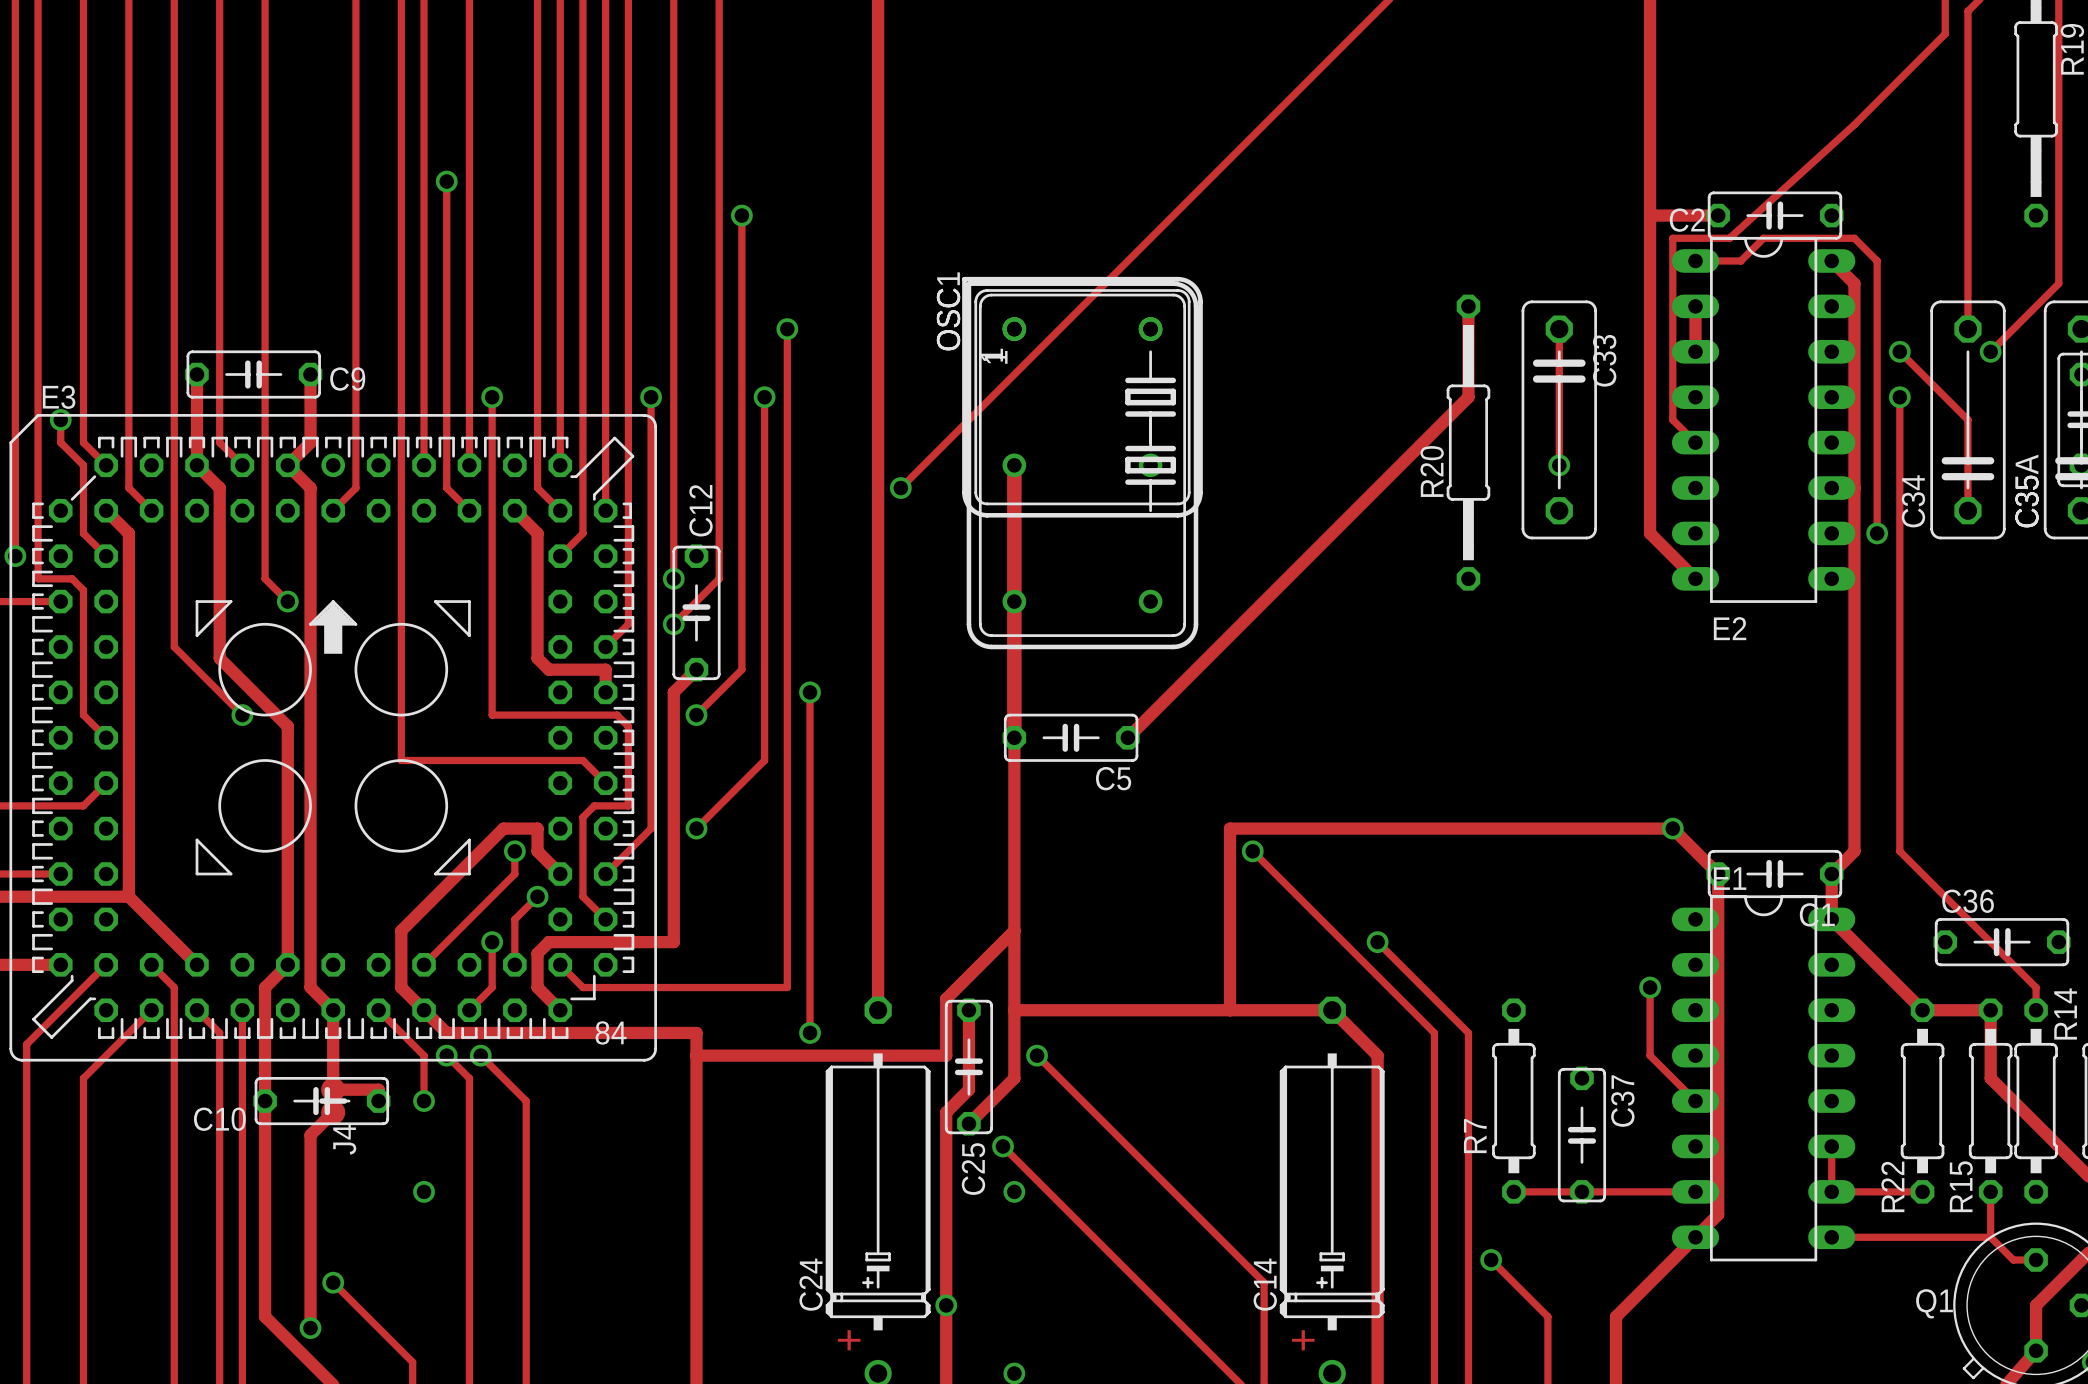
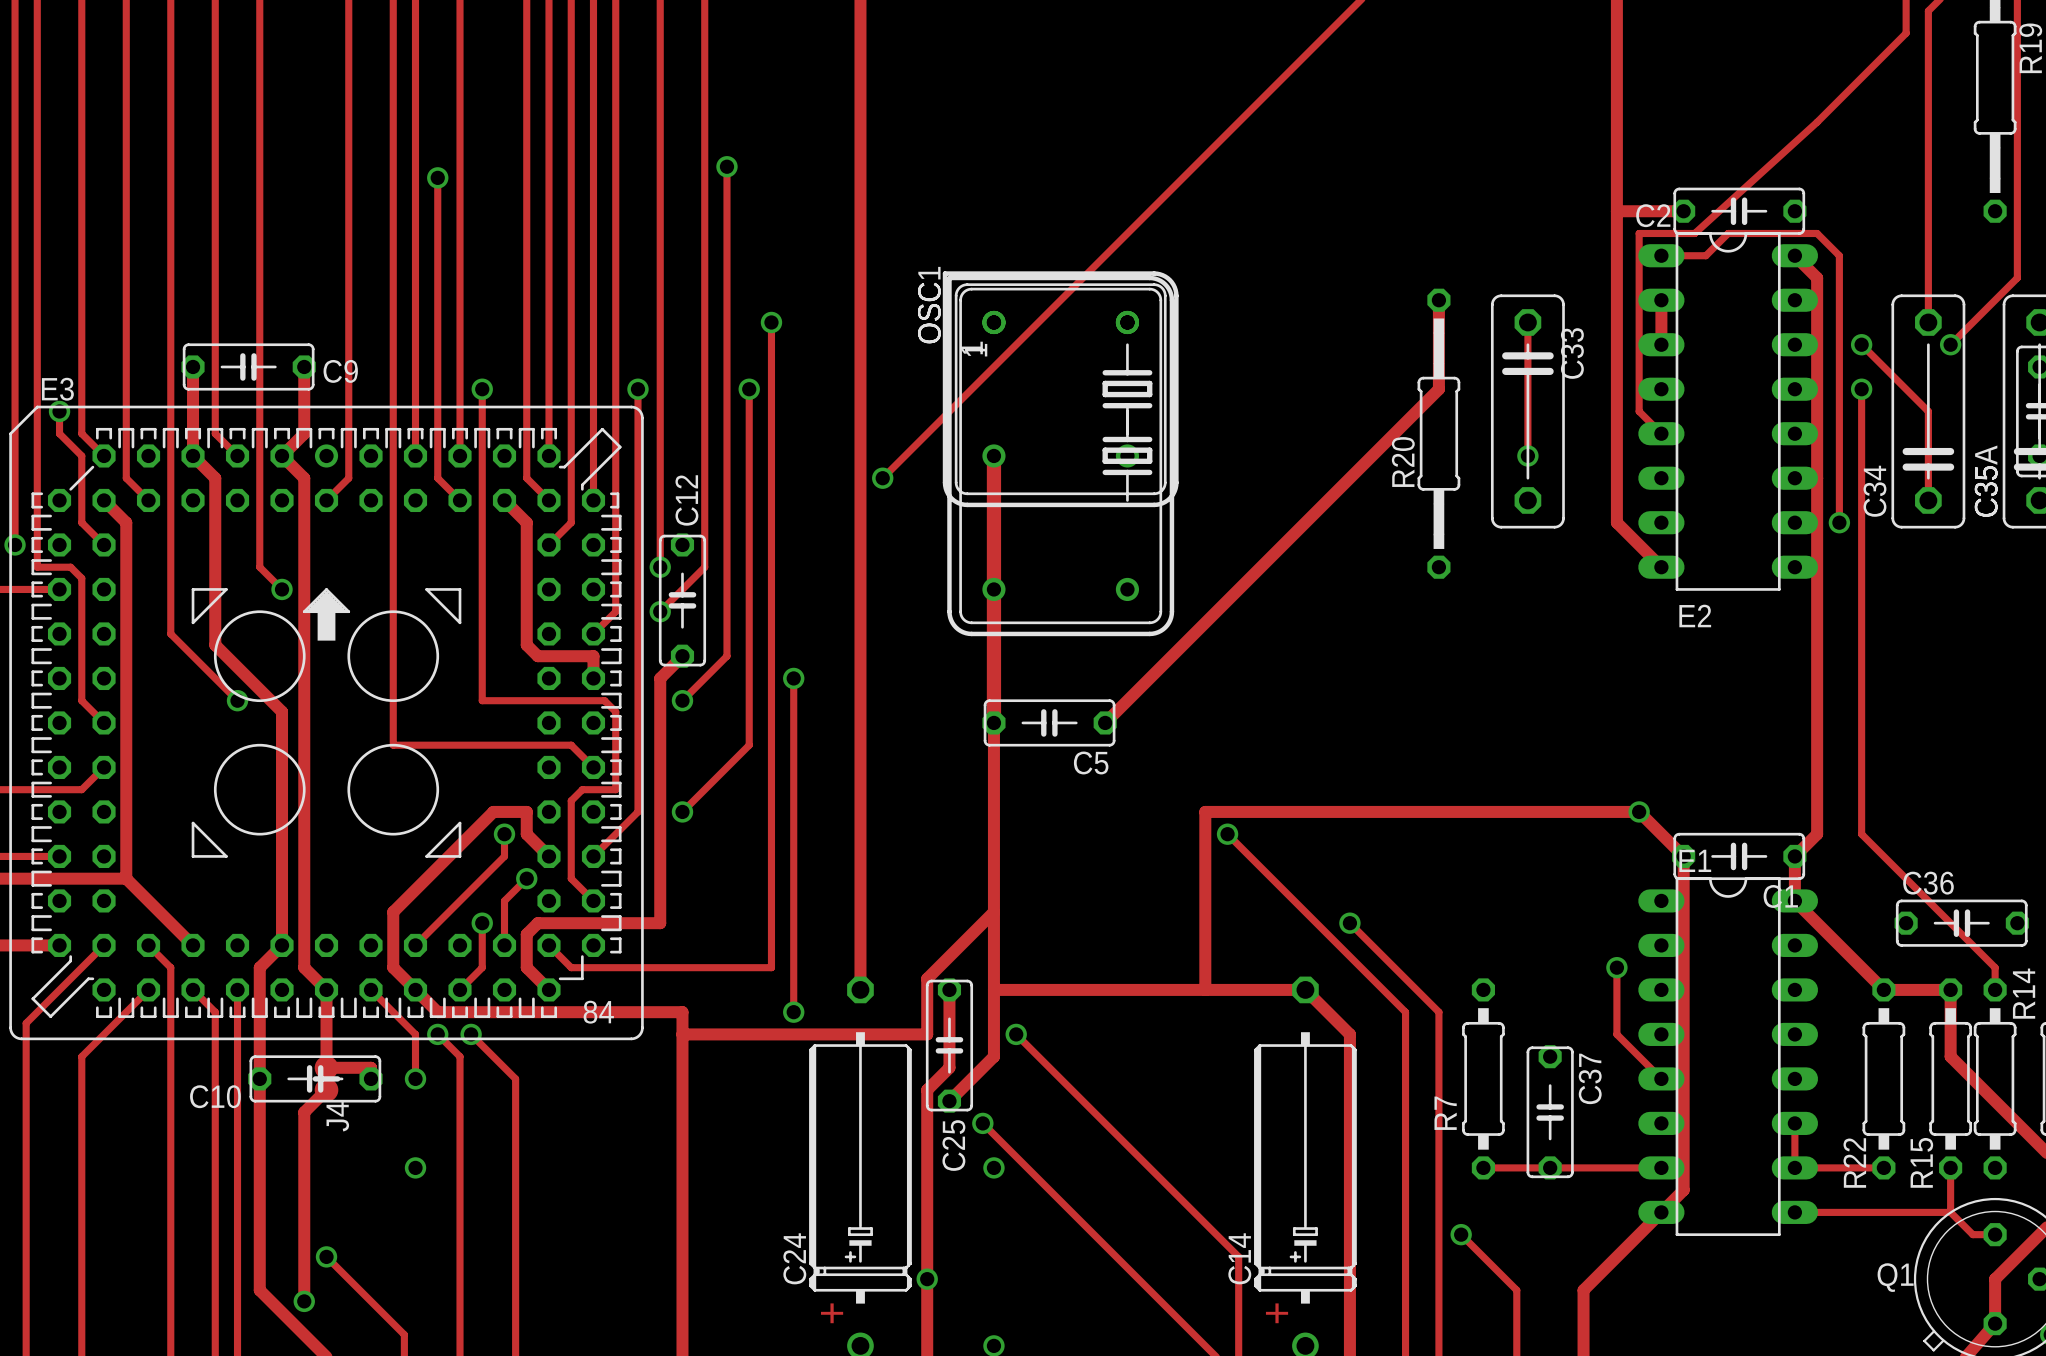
track: none -> (726, 166) (726, 211)
via position: (741, 215) -> (726, 166)

